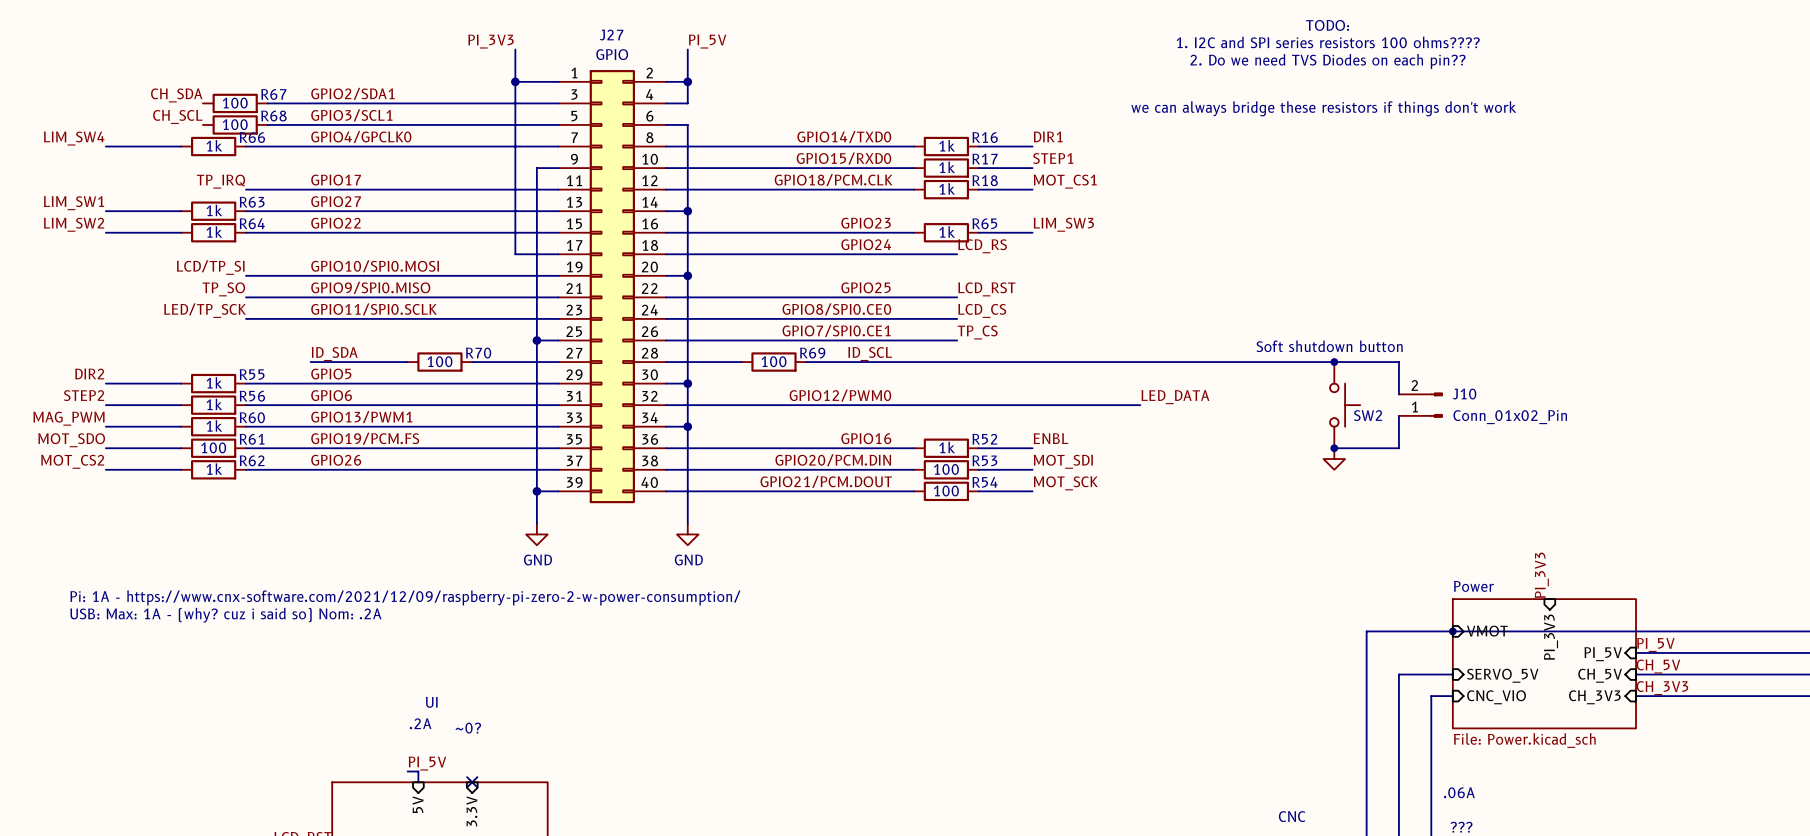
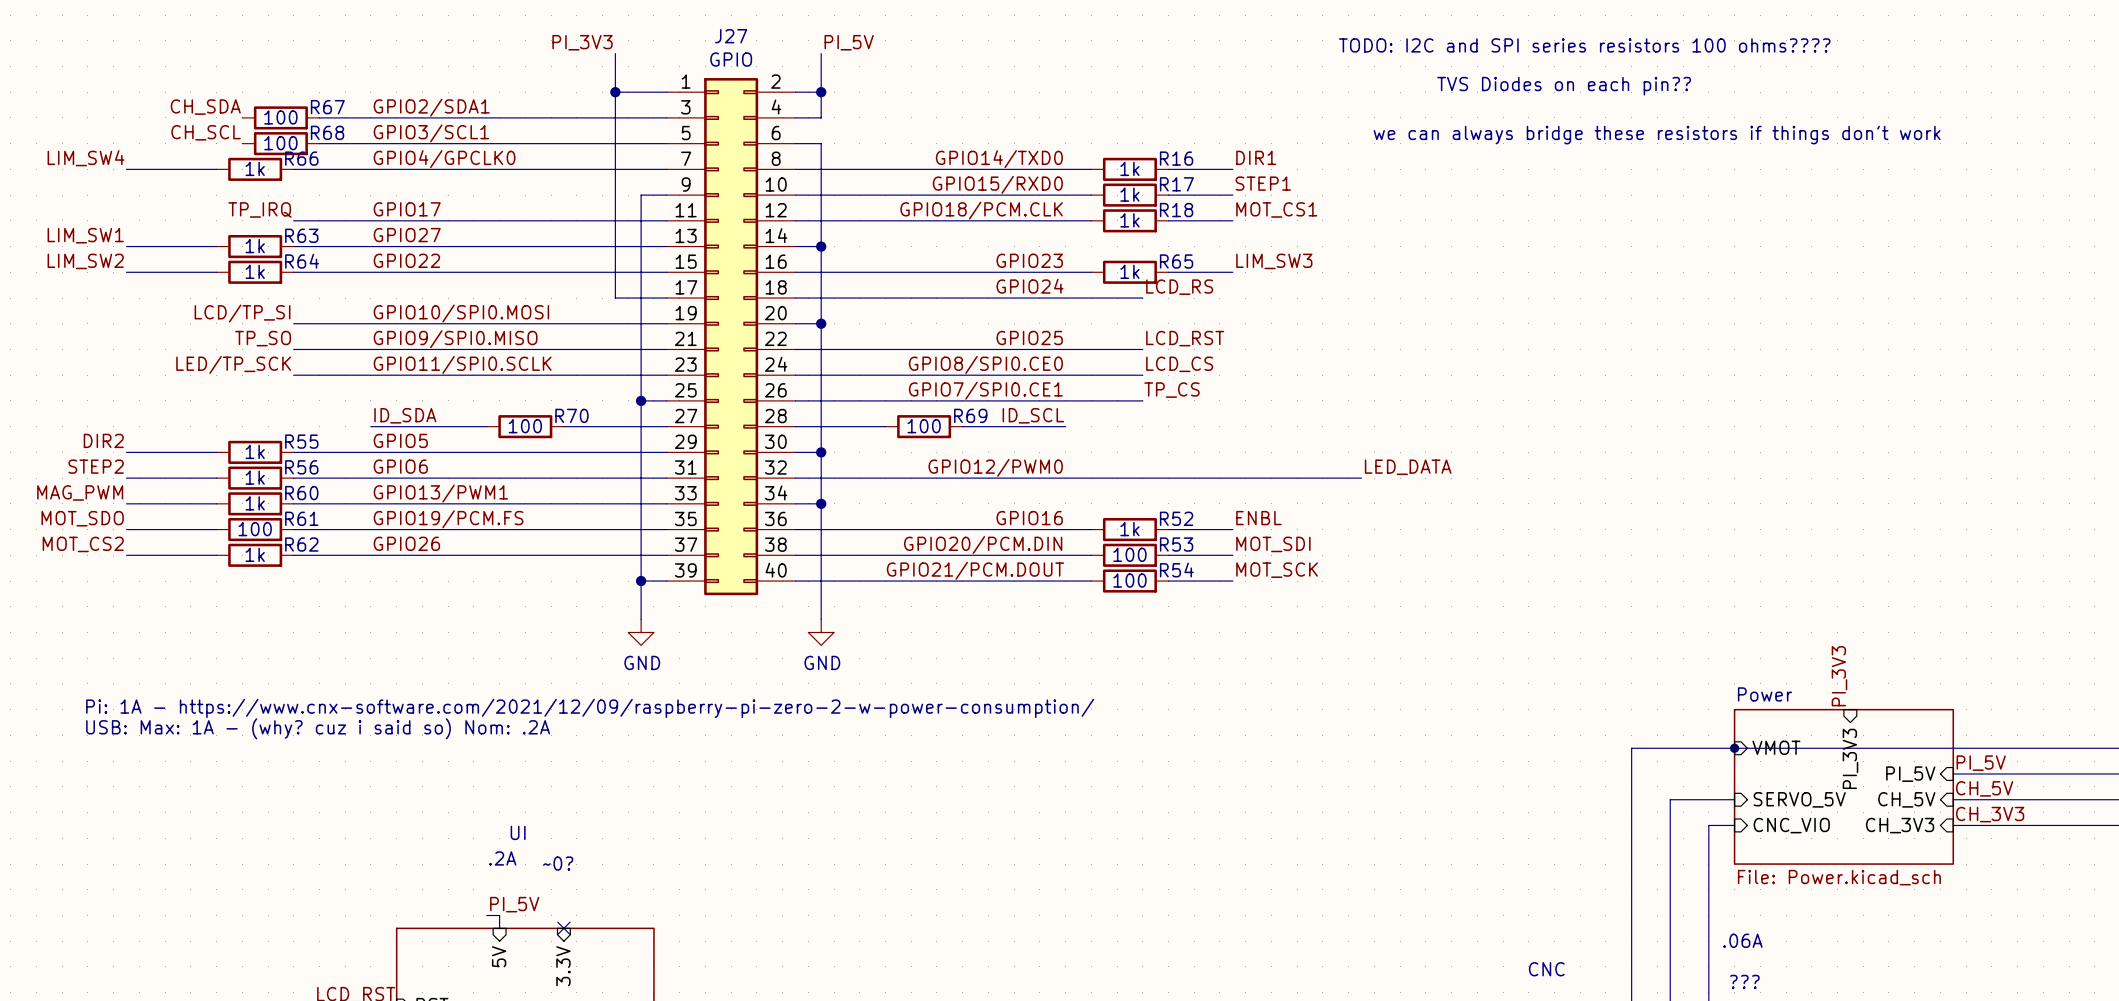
text: TODO: (1327, 25) -> none
text: 1. I2C and SPI series resistors 100 ohms???? (1328, 42) -> TODO: I2C and SPI series resistors 100 ohms???? (1584, 45)
text: 2. Do we need TVS Diodes on each pin?? (1328, 61) -> TVS Diodes on each pin?? (1564, 86)
text position: we can always bridge these resistors if things don't work (1323, 108) -> we can always bridge these resistors if things don't work (1657, 135)
text: Soft shutdown button (1329, 346) -> none
wire: (892, 362) (1398, 362) (1398, 394) -> none
junction: (1334, 362) -> none
SW2: (1345, 405) -> none
J10: Conn_01x02_Pin (1420, 405) -> none
wire: (1398, 415) (1398, 448) (1334, 448) -> none
junction: (1334, 448) -> none
power symbol: (1334, 459) -> none

